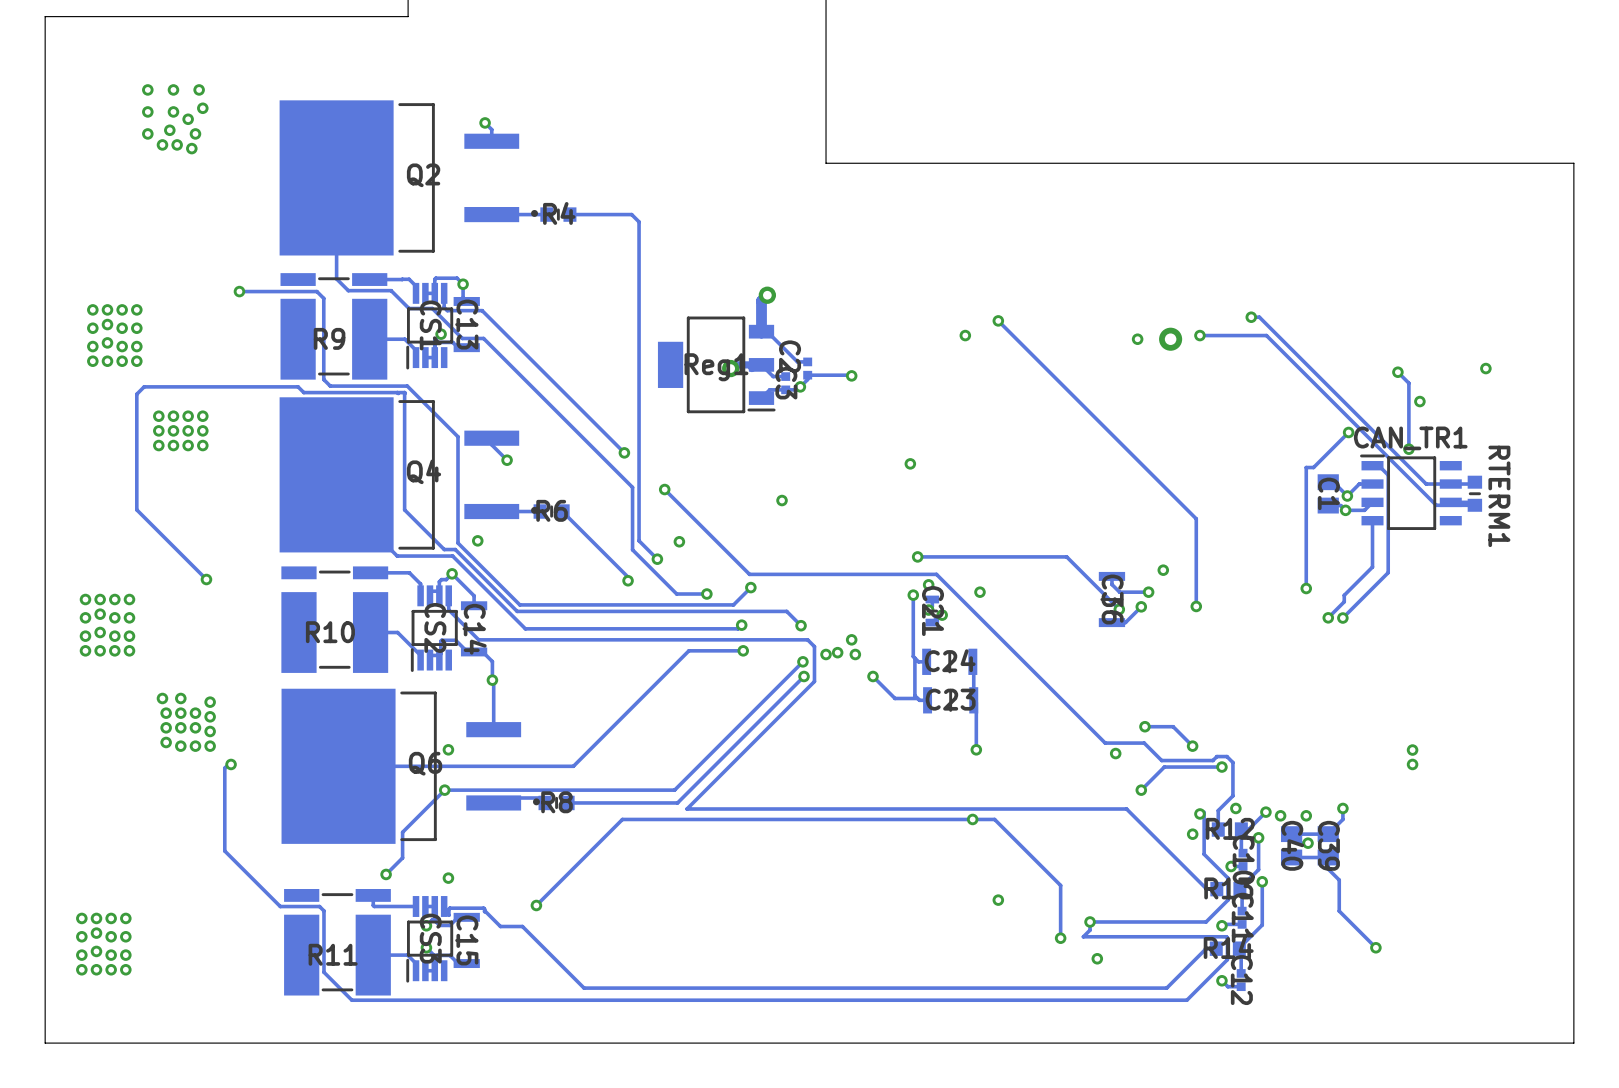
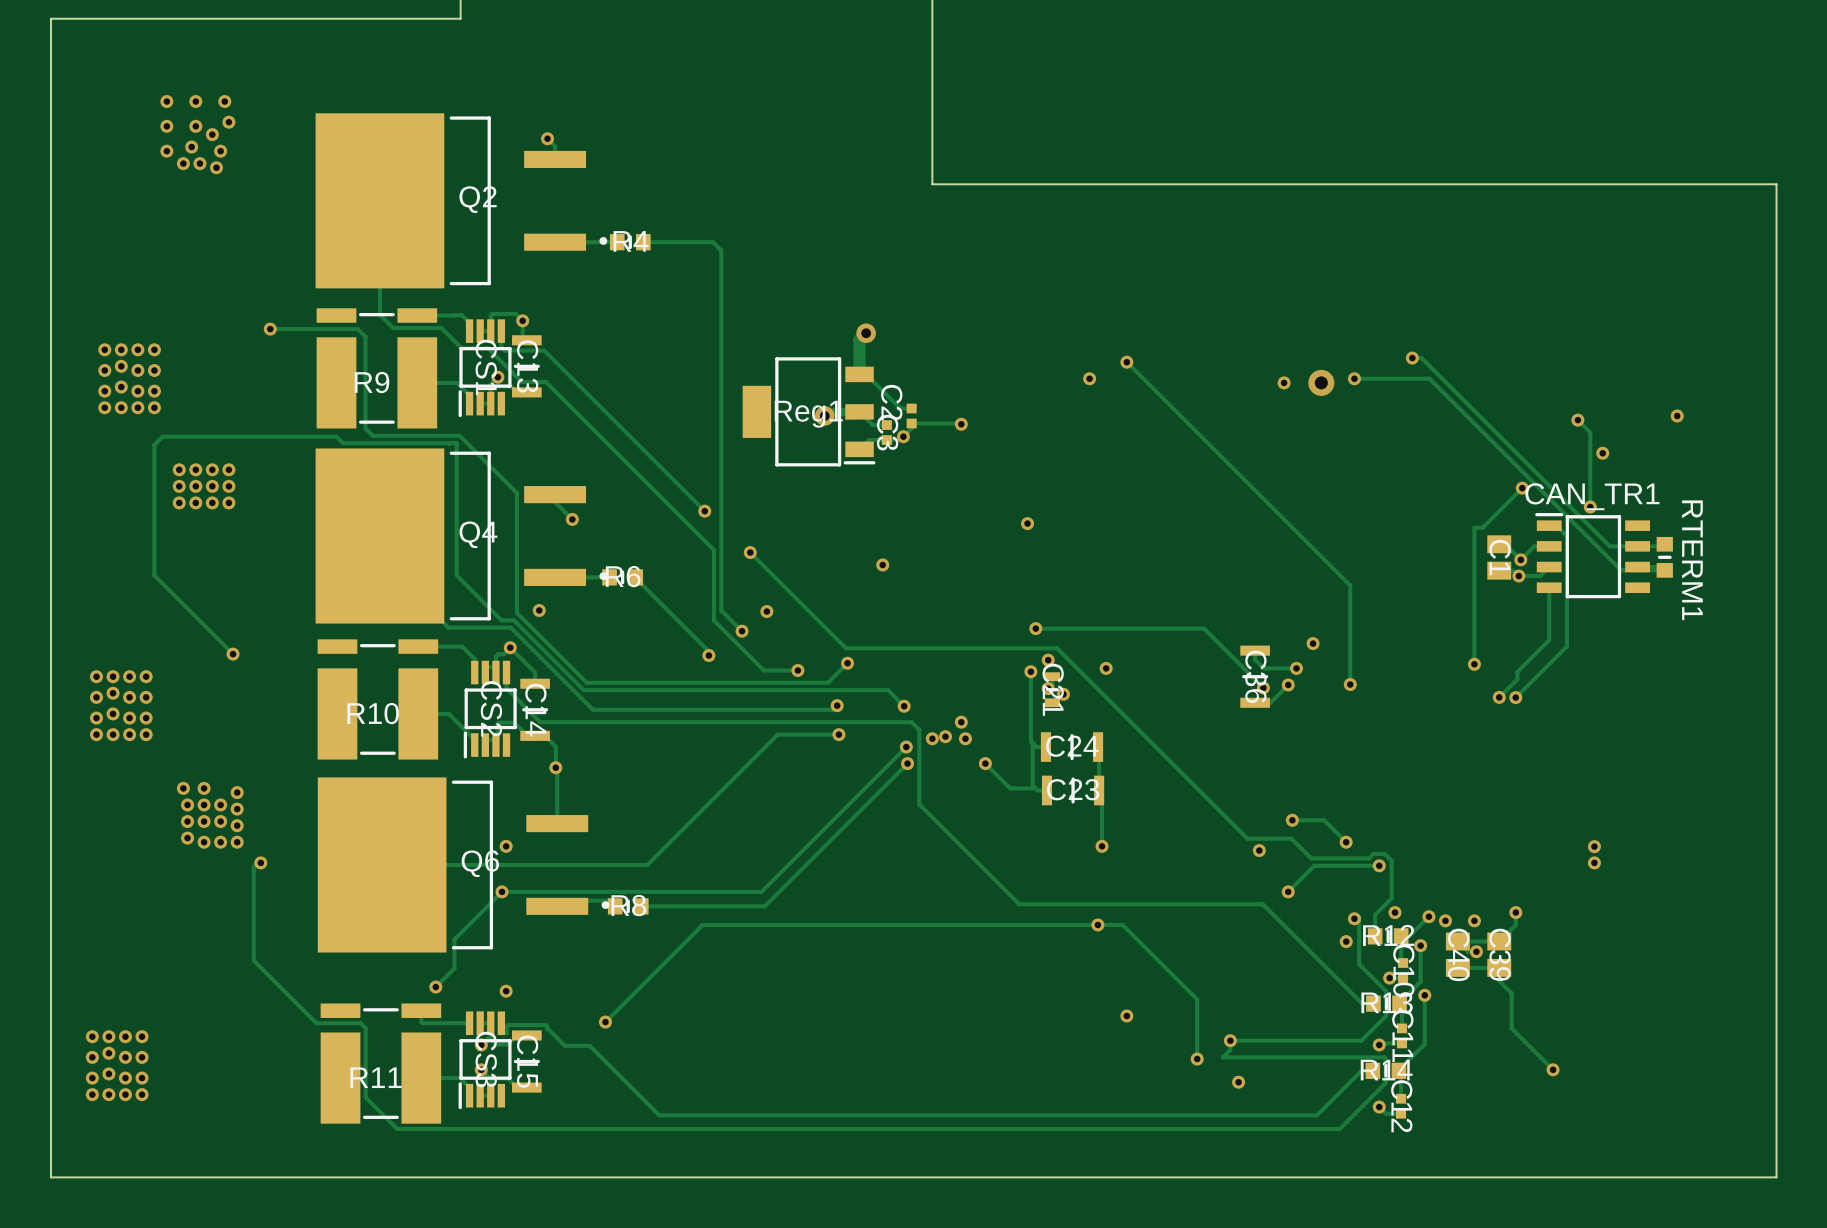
track: (814, 681) (686, 809) (1126, 809) -> (919, 769) (919, 804) (1019, 904) (1262, 904) (1271, 913)

